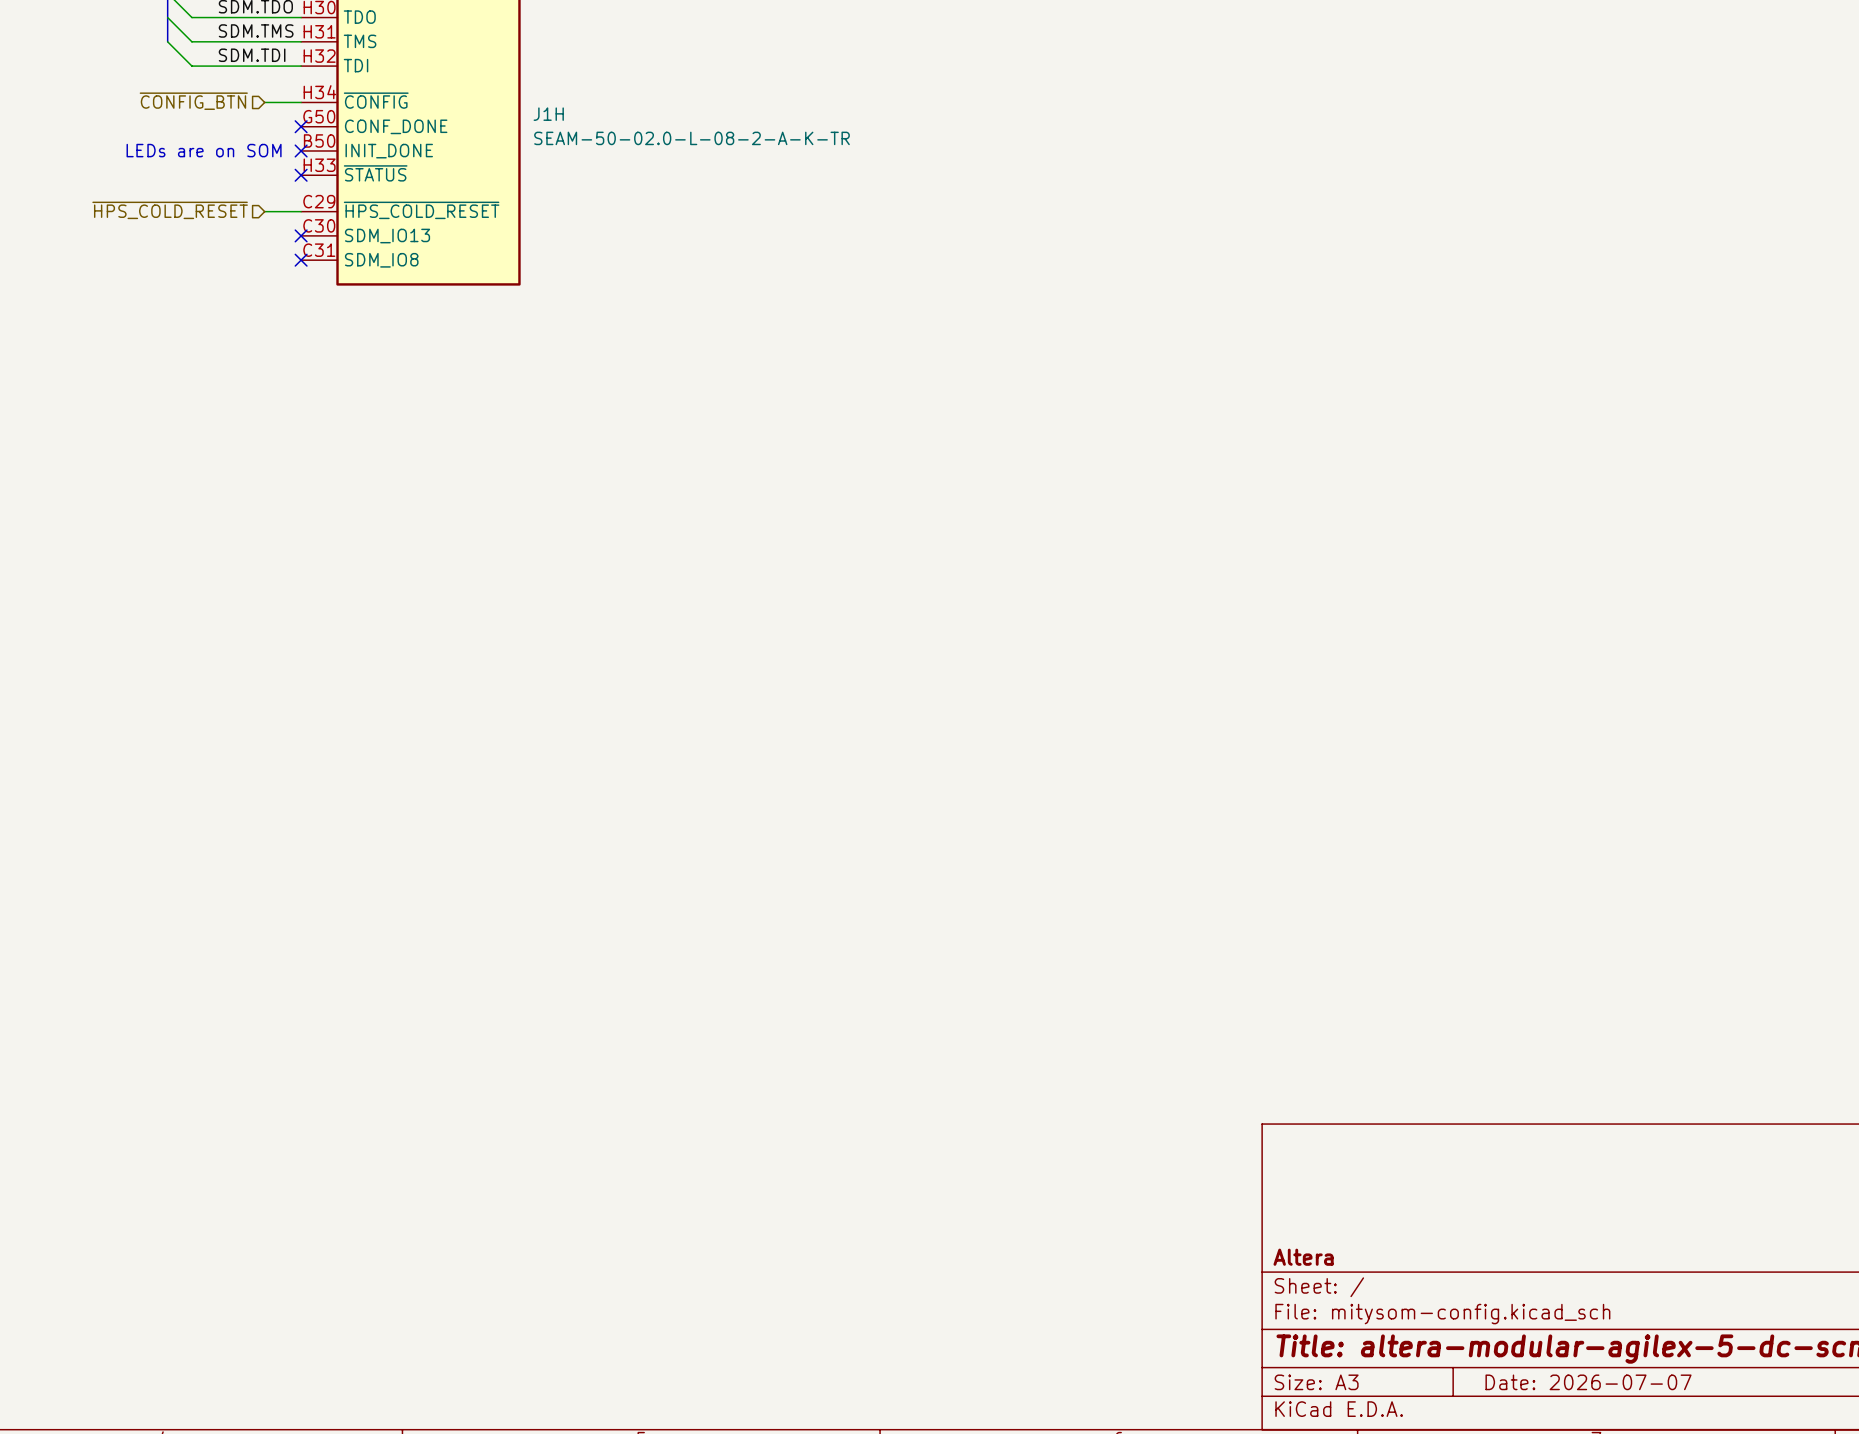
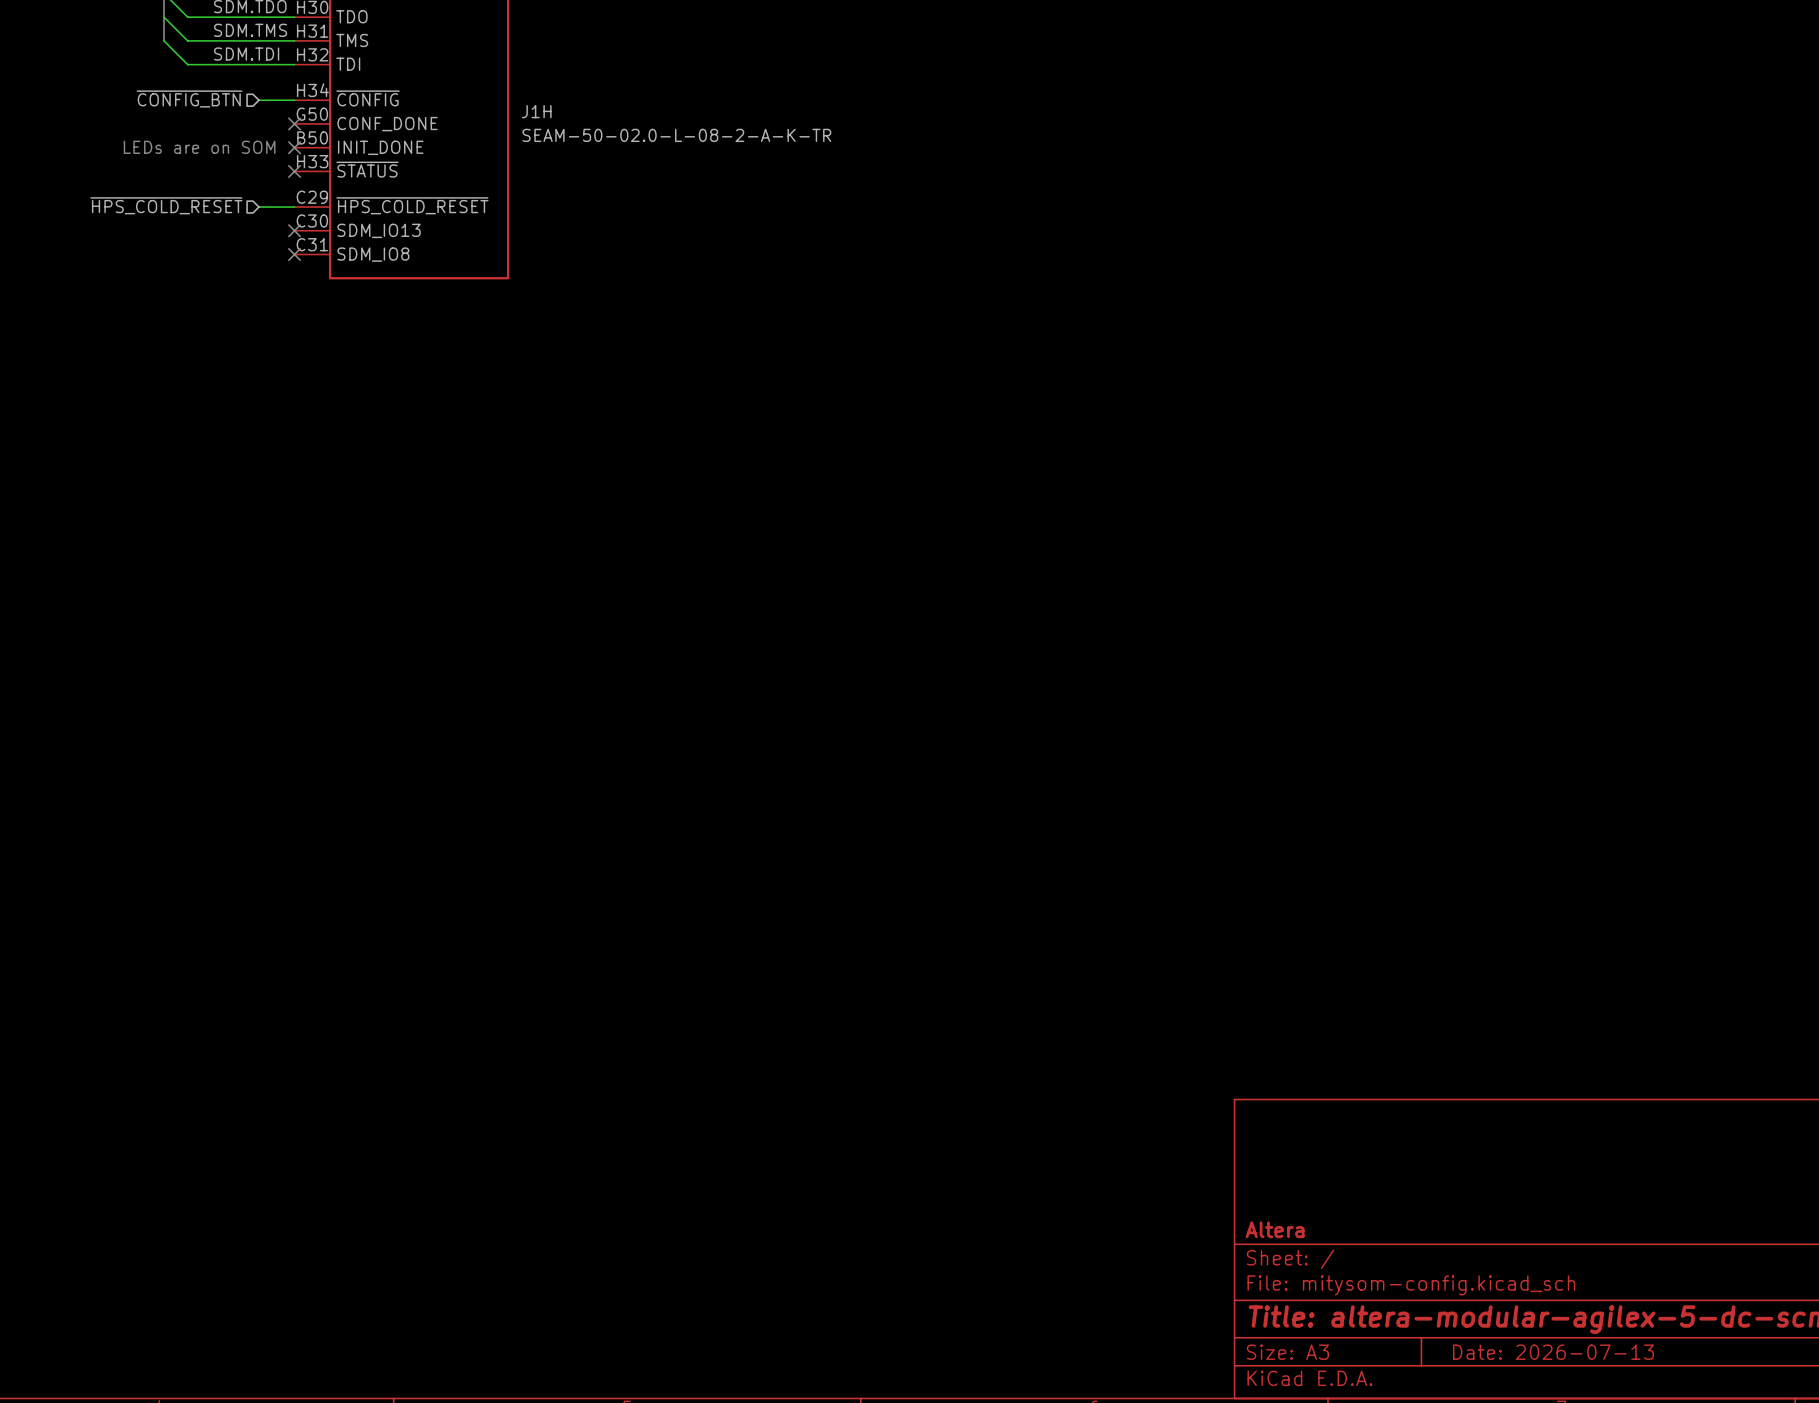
title block: Date: 2026-07-07 (1588, 1382) -> Date: 2026-07-13 (1553, 1352)

